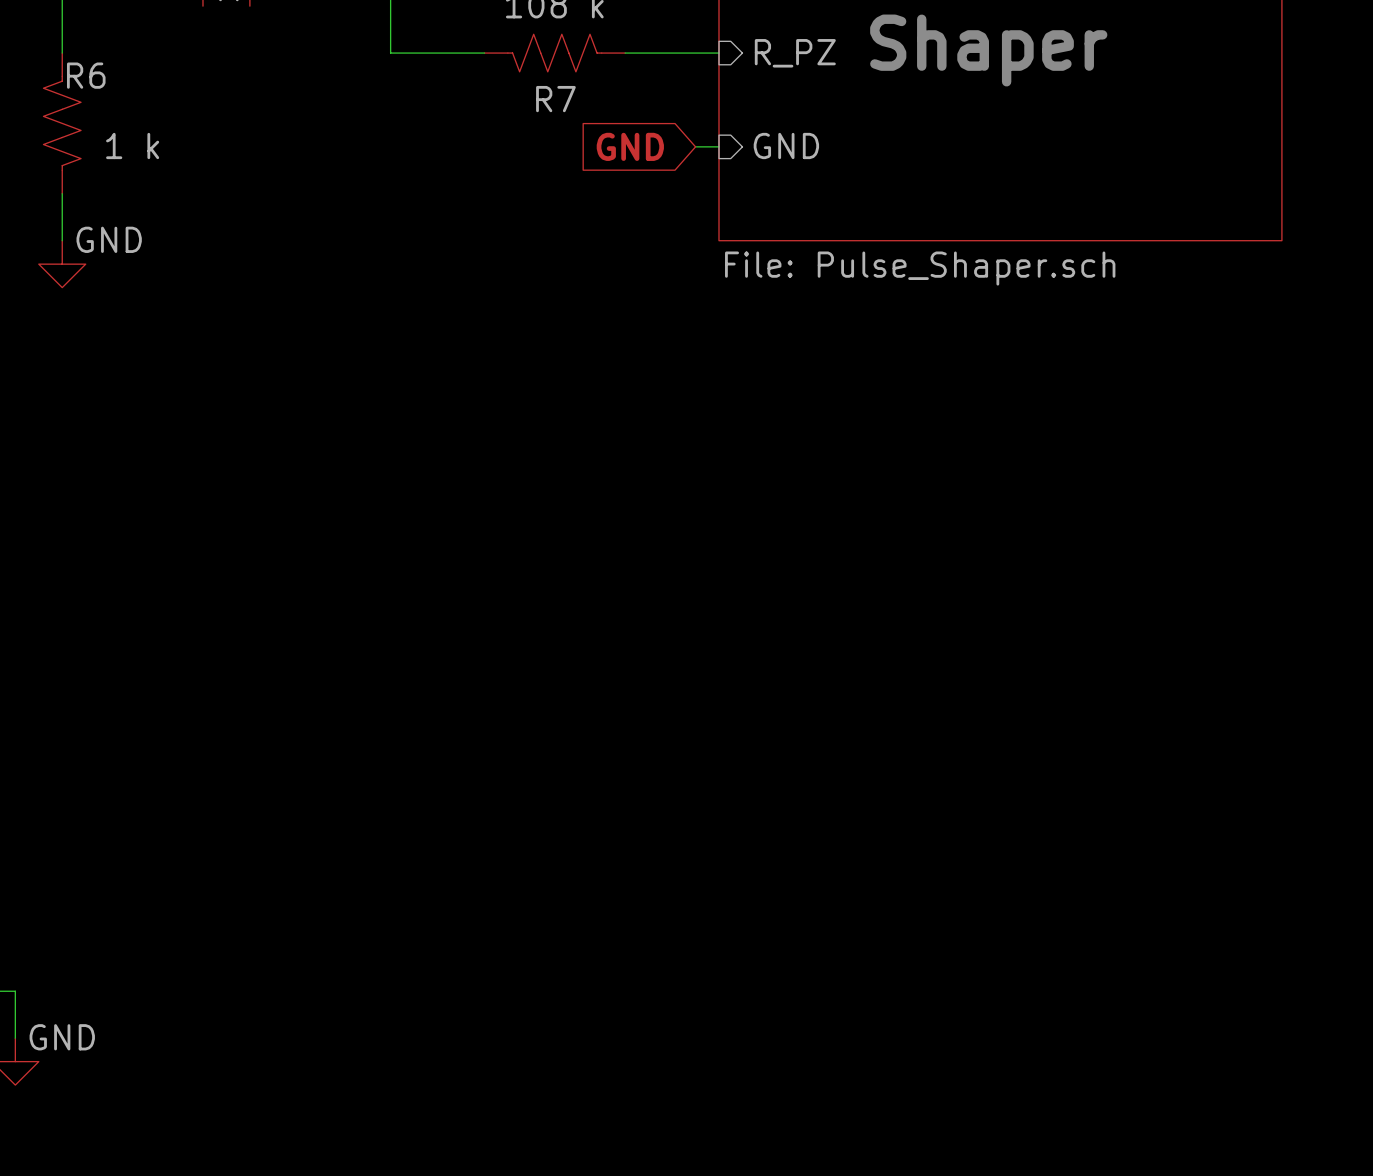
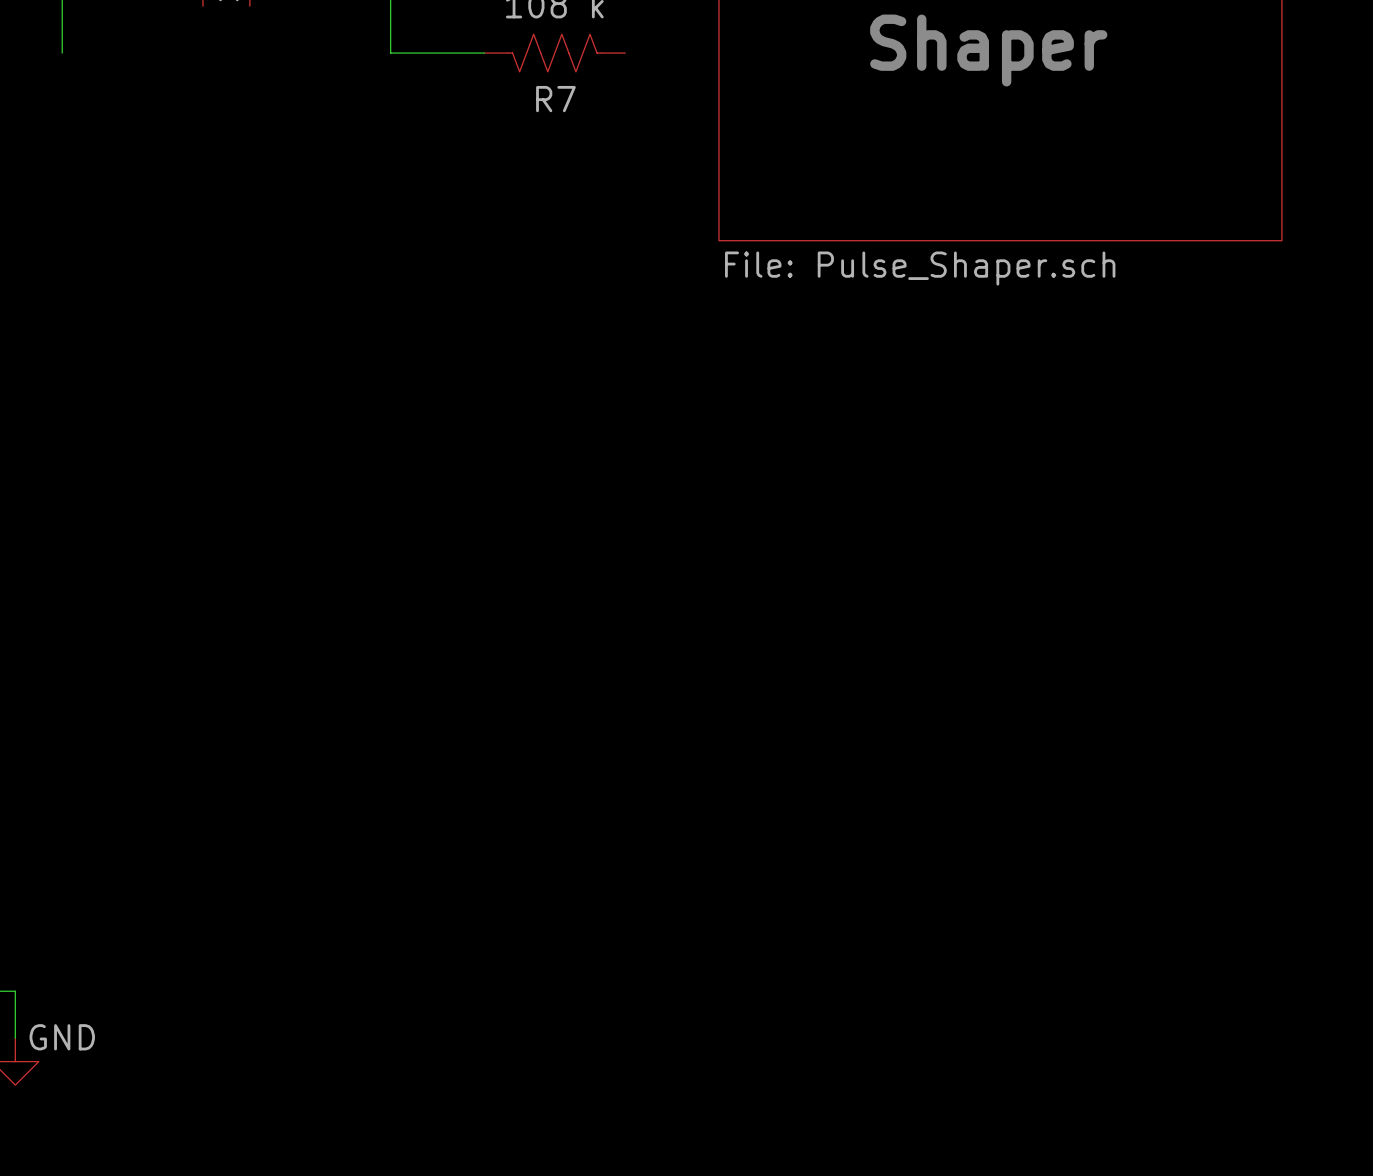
wire: (625, 53) (718, 53) -> none
sheet pin: R_PZ (795, 53) -> none
R6: 1 k (62, 123) -> none
sheet pin: GND (786, 145) -> none
global label: GND (630, 146) -> none
wire: (695, 146) (718, 146) -> none
wire: (62, 193) (62, 240) -> none
power symbol: GND (62, 264) -> none

